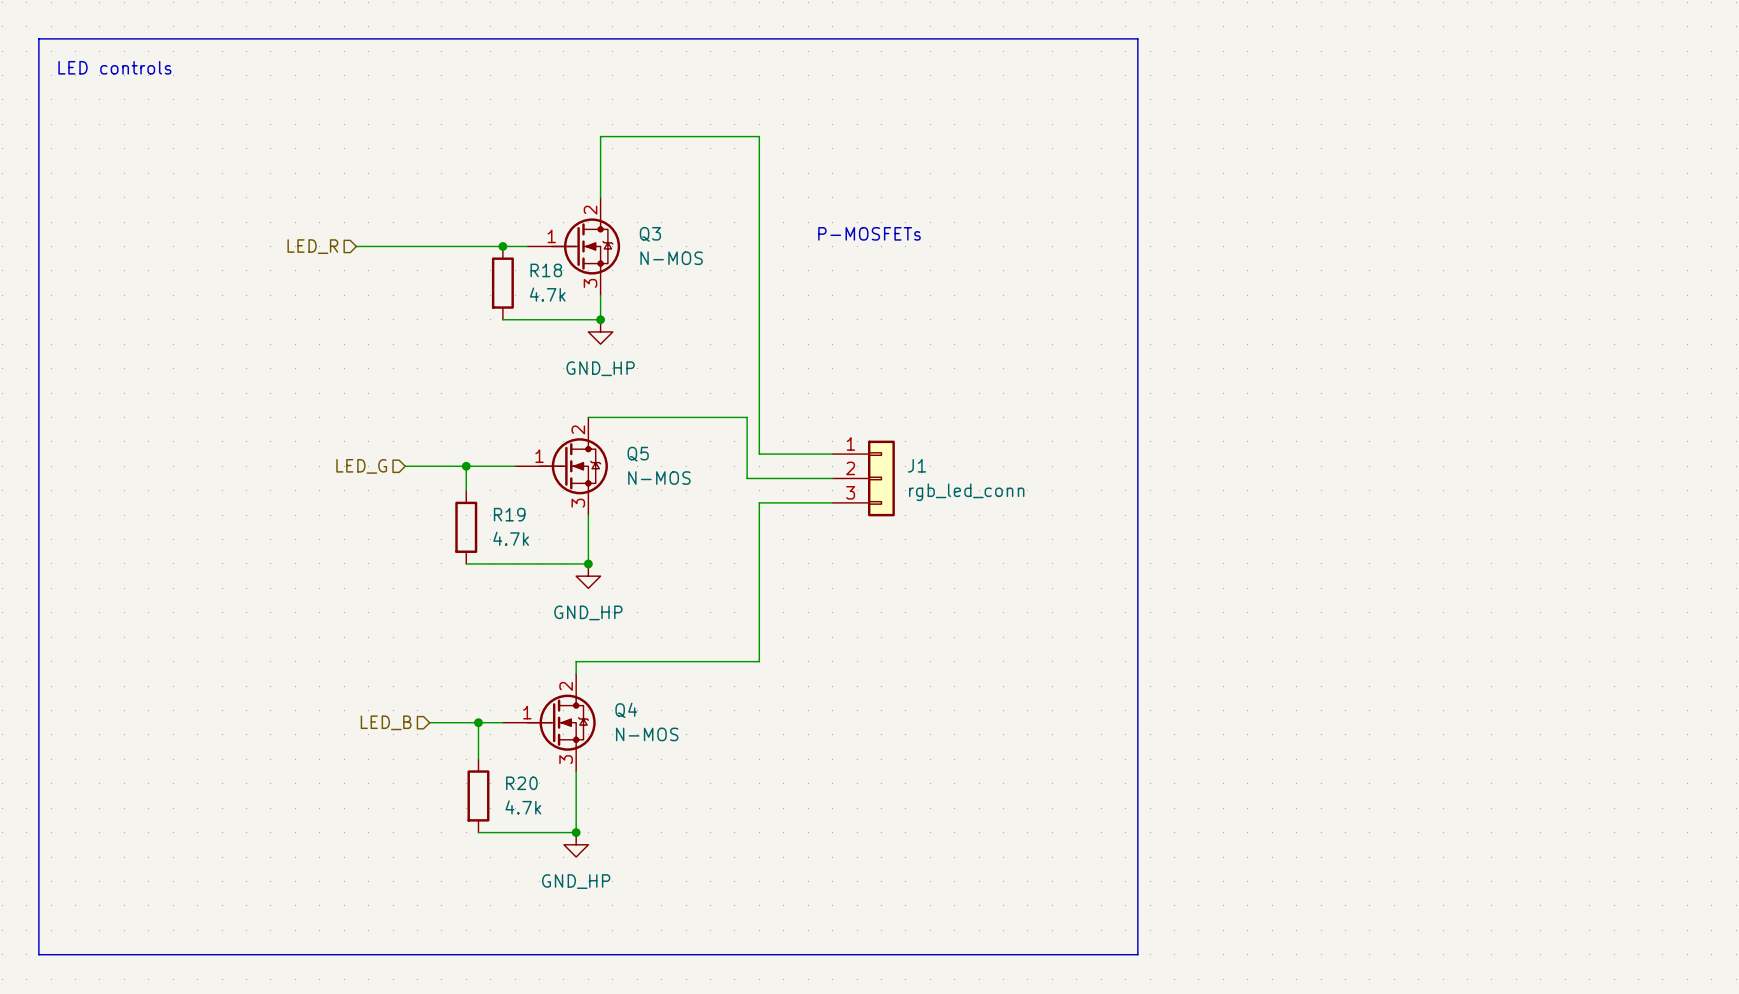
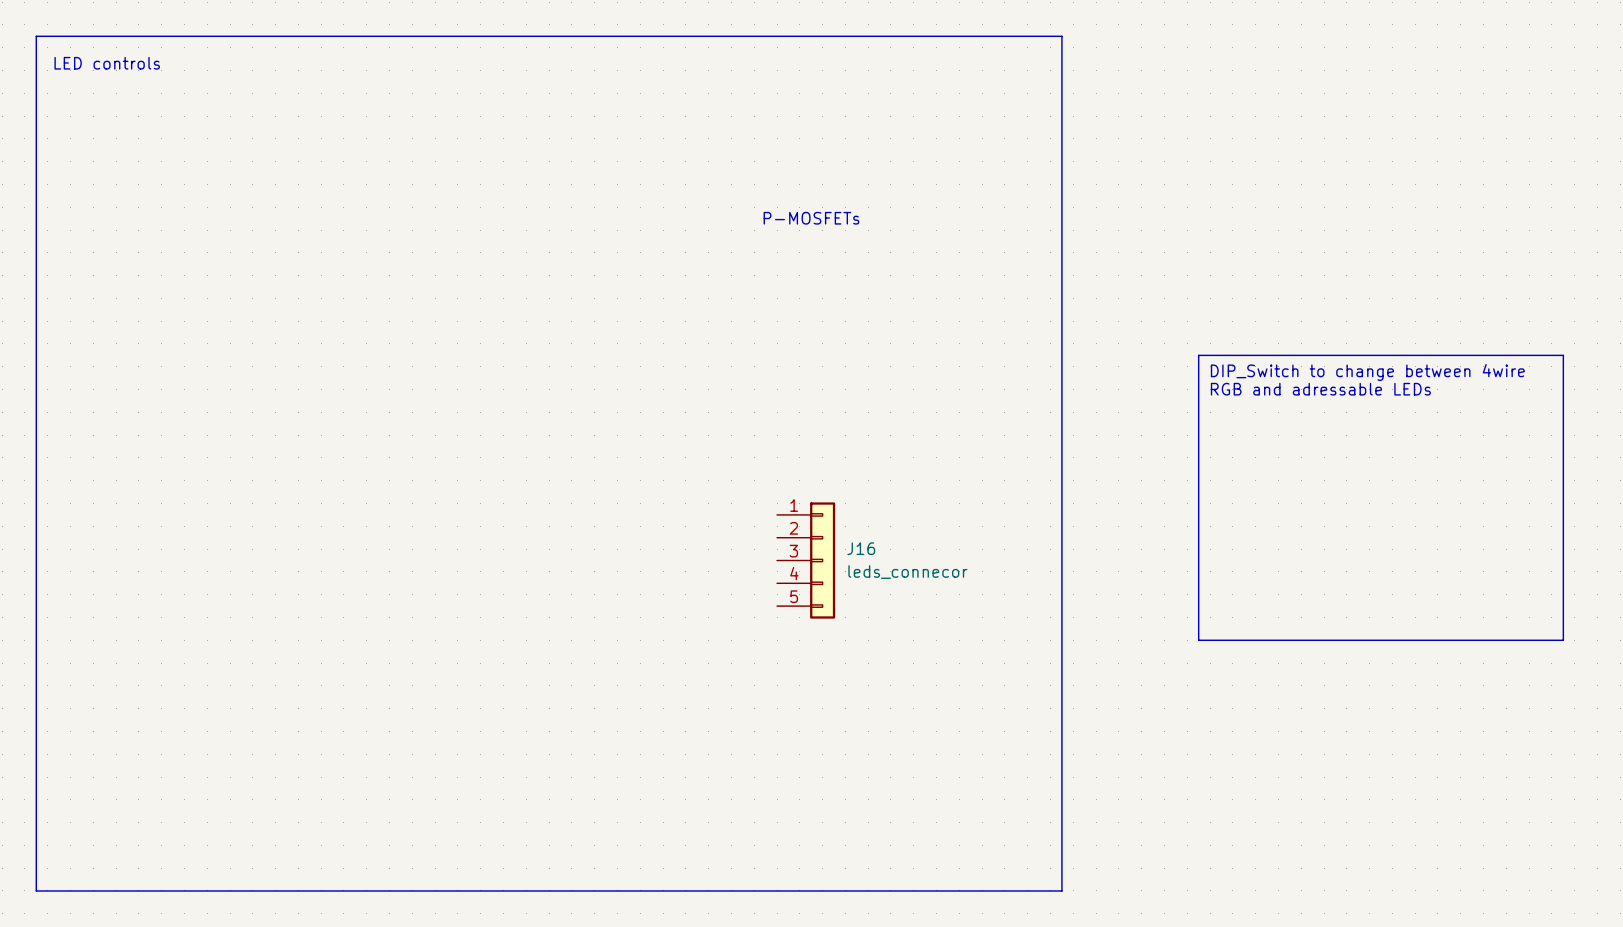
wire: (600, 197) (600, 136) (759, 136) (759, 454) (832, 454) -> none
hierarchical label: LED_R (312, 246) -> none
wire: (356, 246) (527, 246) -> none
junction: (502, 246) -> none
Q3: N-MOS (573, 246) -> none
R18: 4.7k (502, 283) -> none
wire: (600, 295) (600, 319) (502, 319) -> none
junction: (600, 319) -> none
power symbol: GND_HP (600, 331) -> none
line: none -> (1198, 355) (1563, 355) (1563, 640) (1198, 640) (1198, 355)
text: none -> DIP_Switch to change between 4wire (1367, 372)
wire: (588, 417) (747, 417) (747, 478) (832, 478) -> none
text: none -> RGB and adressable LEDs (1320, 389)
hierarchical label: LED_G (361, 466) -> none
wire: (405, 466) (515, 466) -> none
wire: (466, 466) (466, 490) -> none
junction: (466, 466) -> none
Q5: N-MOS (561, 466) -> none
J1: rgb_led_conn (863, 478) -> none
wire: (832, 502) (759, 502) (759, 661) (576, 661) (576, 673) -> none
wire: (588, 515) (588, 563) (466, 563) -> none
R19: 4.7k (466, 527) -> none
junction: (588, 563) -> none
power symbol: GND_HP (588, 576) -> none
J16: none -> leds_connecor (806, 560)
hierarchical label: LED_B (386, 722) -> none
wire: (429, 722) (502, 722) -> none
wire: (478, 722) (478, 759) -> none
junction: (478, 722) -> none
Q4: N-MOS (549, 722) -> none
wire: (576, 771) (576, 832) (478, 832) -> none
R20: 4.7k (478, 795) -> none
junction: (576, 832) -> none
power symbol: GND_HP (576, 844) -> none

